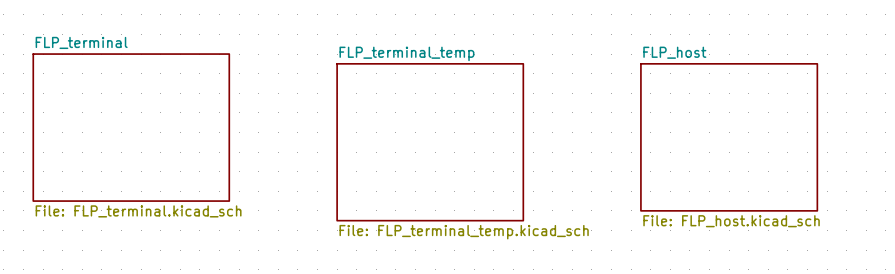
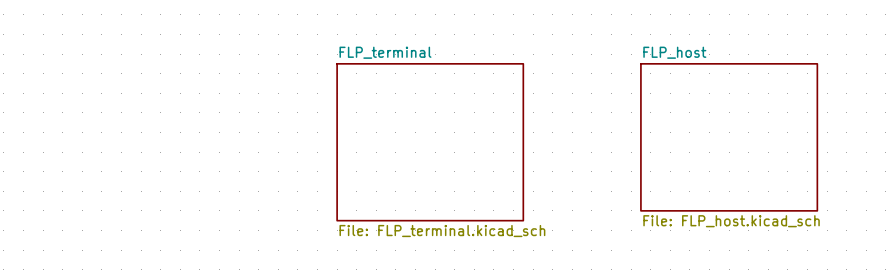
sheet FLP_terminal_temp name: FLP_terminal_temp (406, 53) -> FLP_terminal (385, 52)
sheet FLP_terminal: File: FLP_terminal.kicad_sch (131, 127) -> none
sheet FLP_terminal_temp value: File: FLP_terminal_temp.kicad_sch (464, 232) -> File: FLP_terminal.kicad_sch (442, 231)

